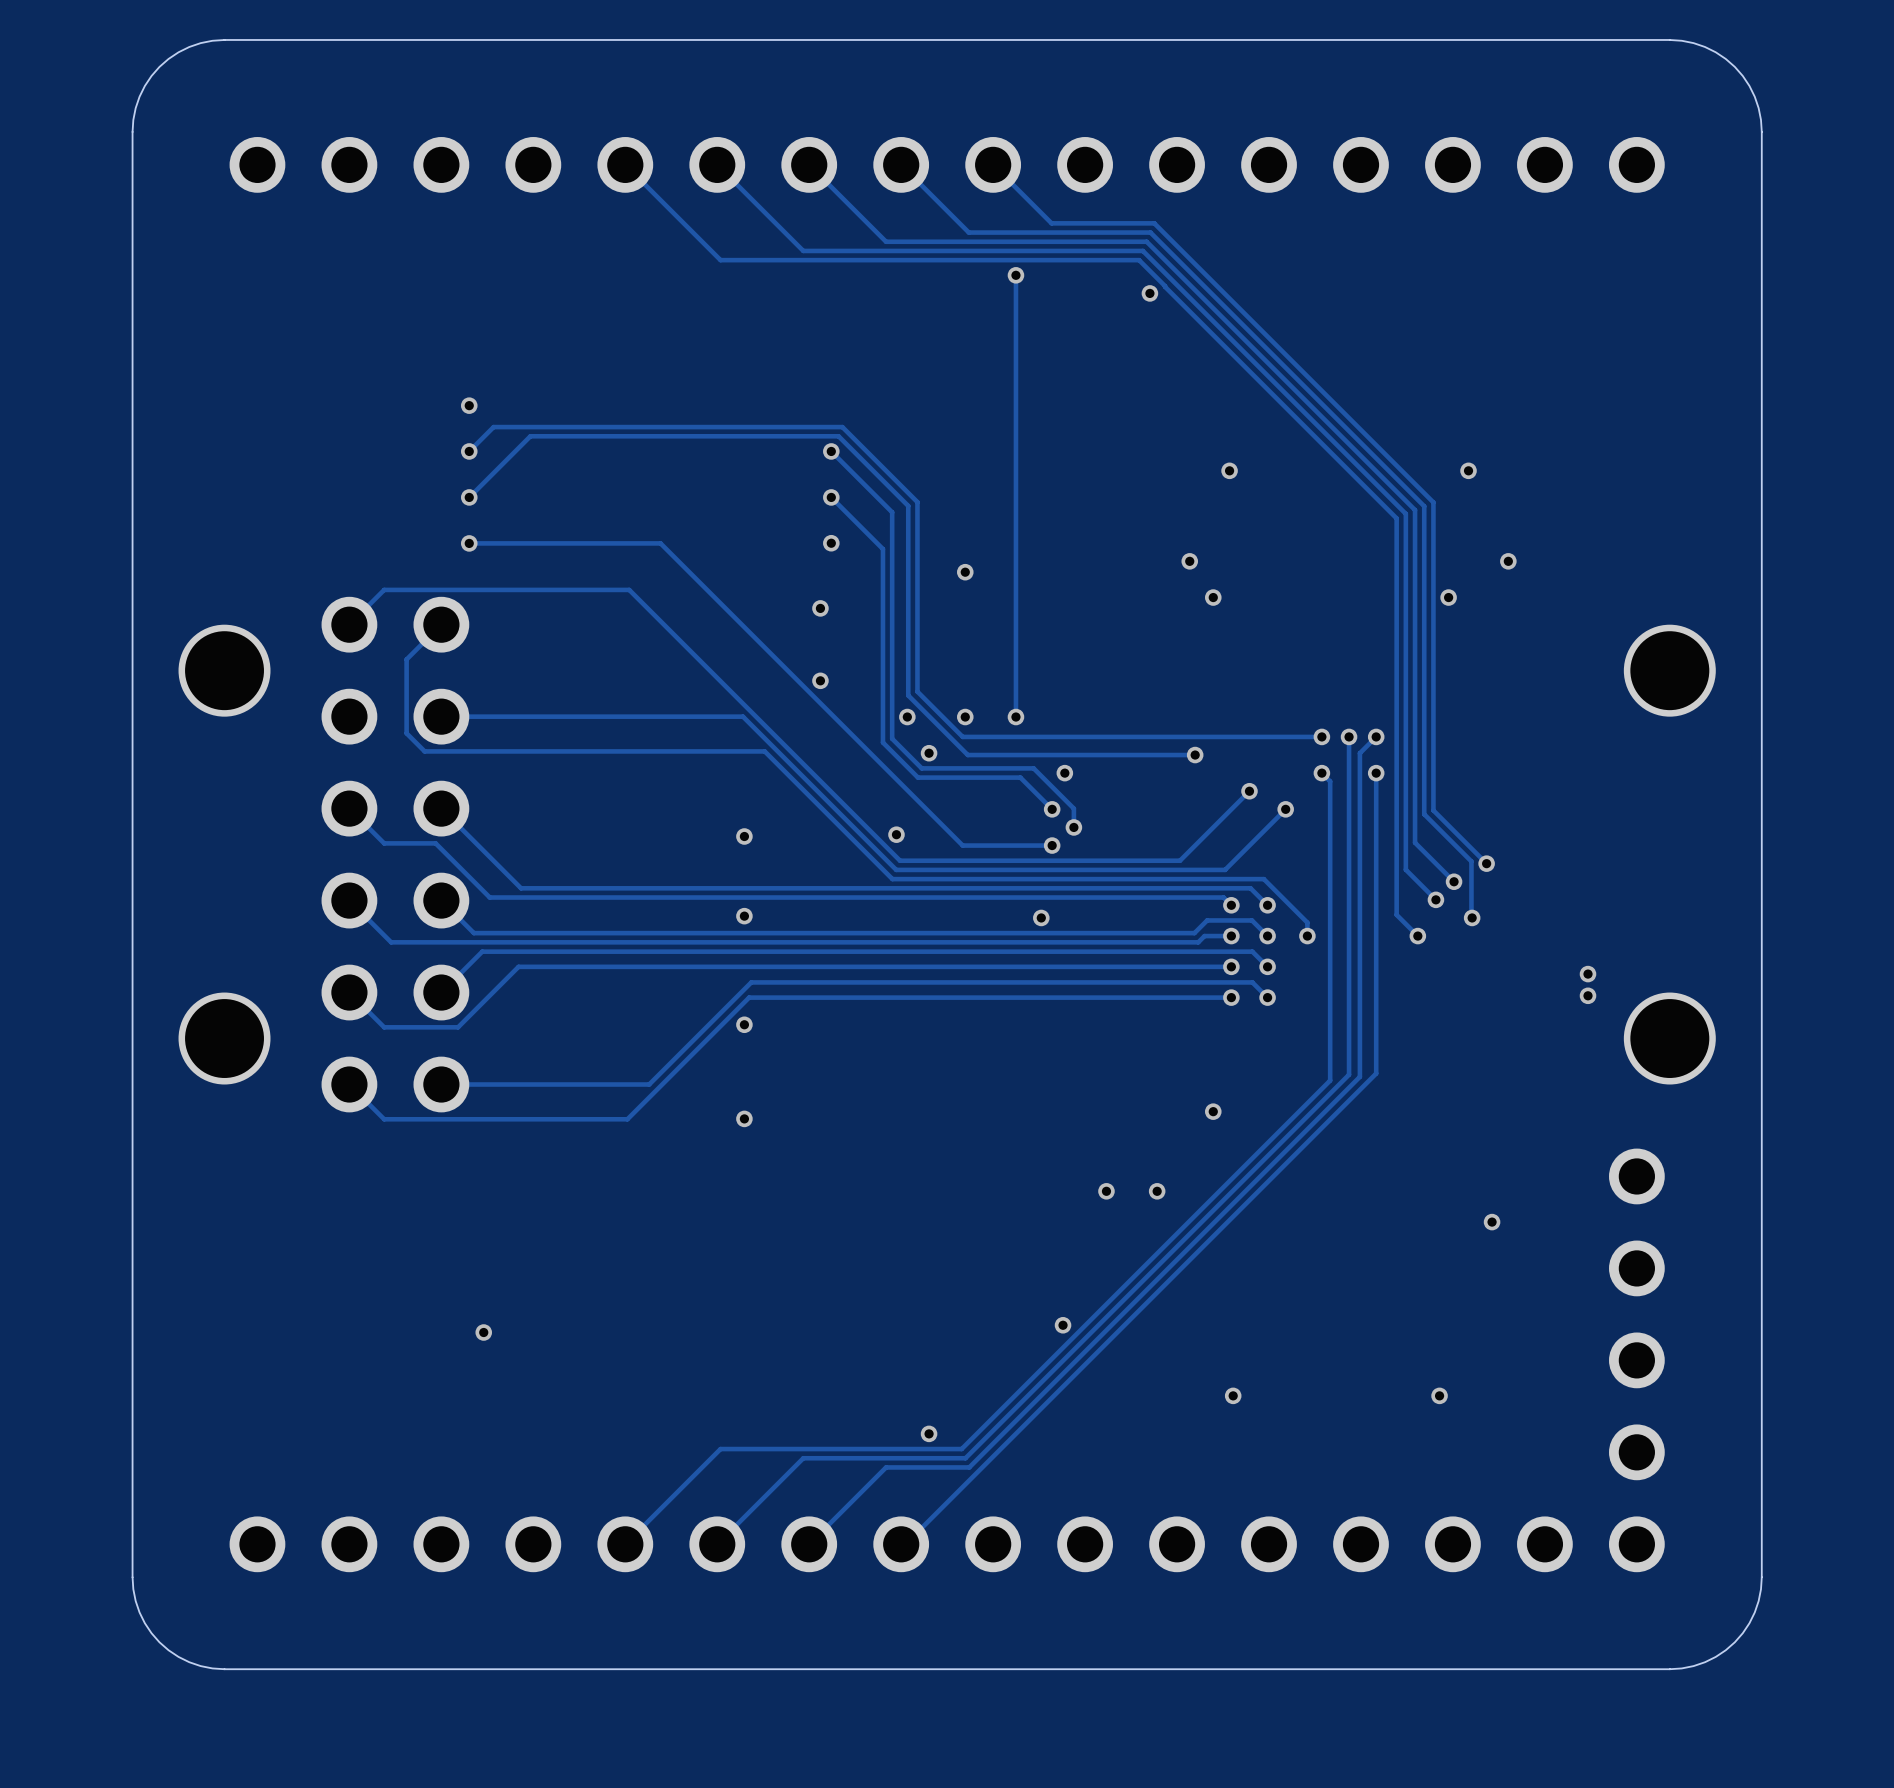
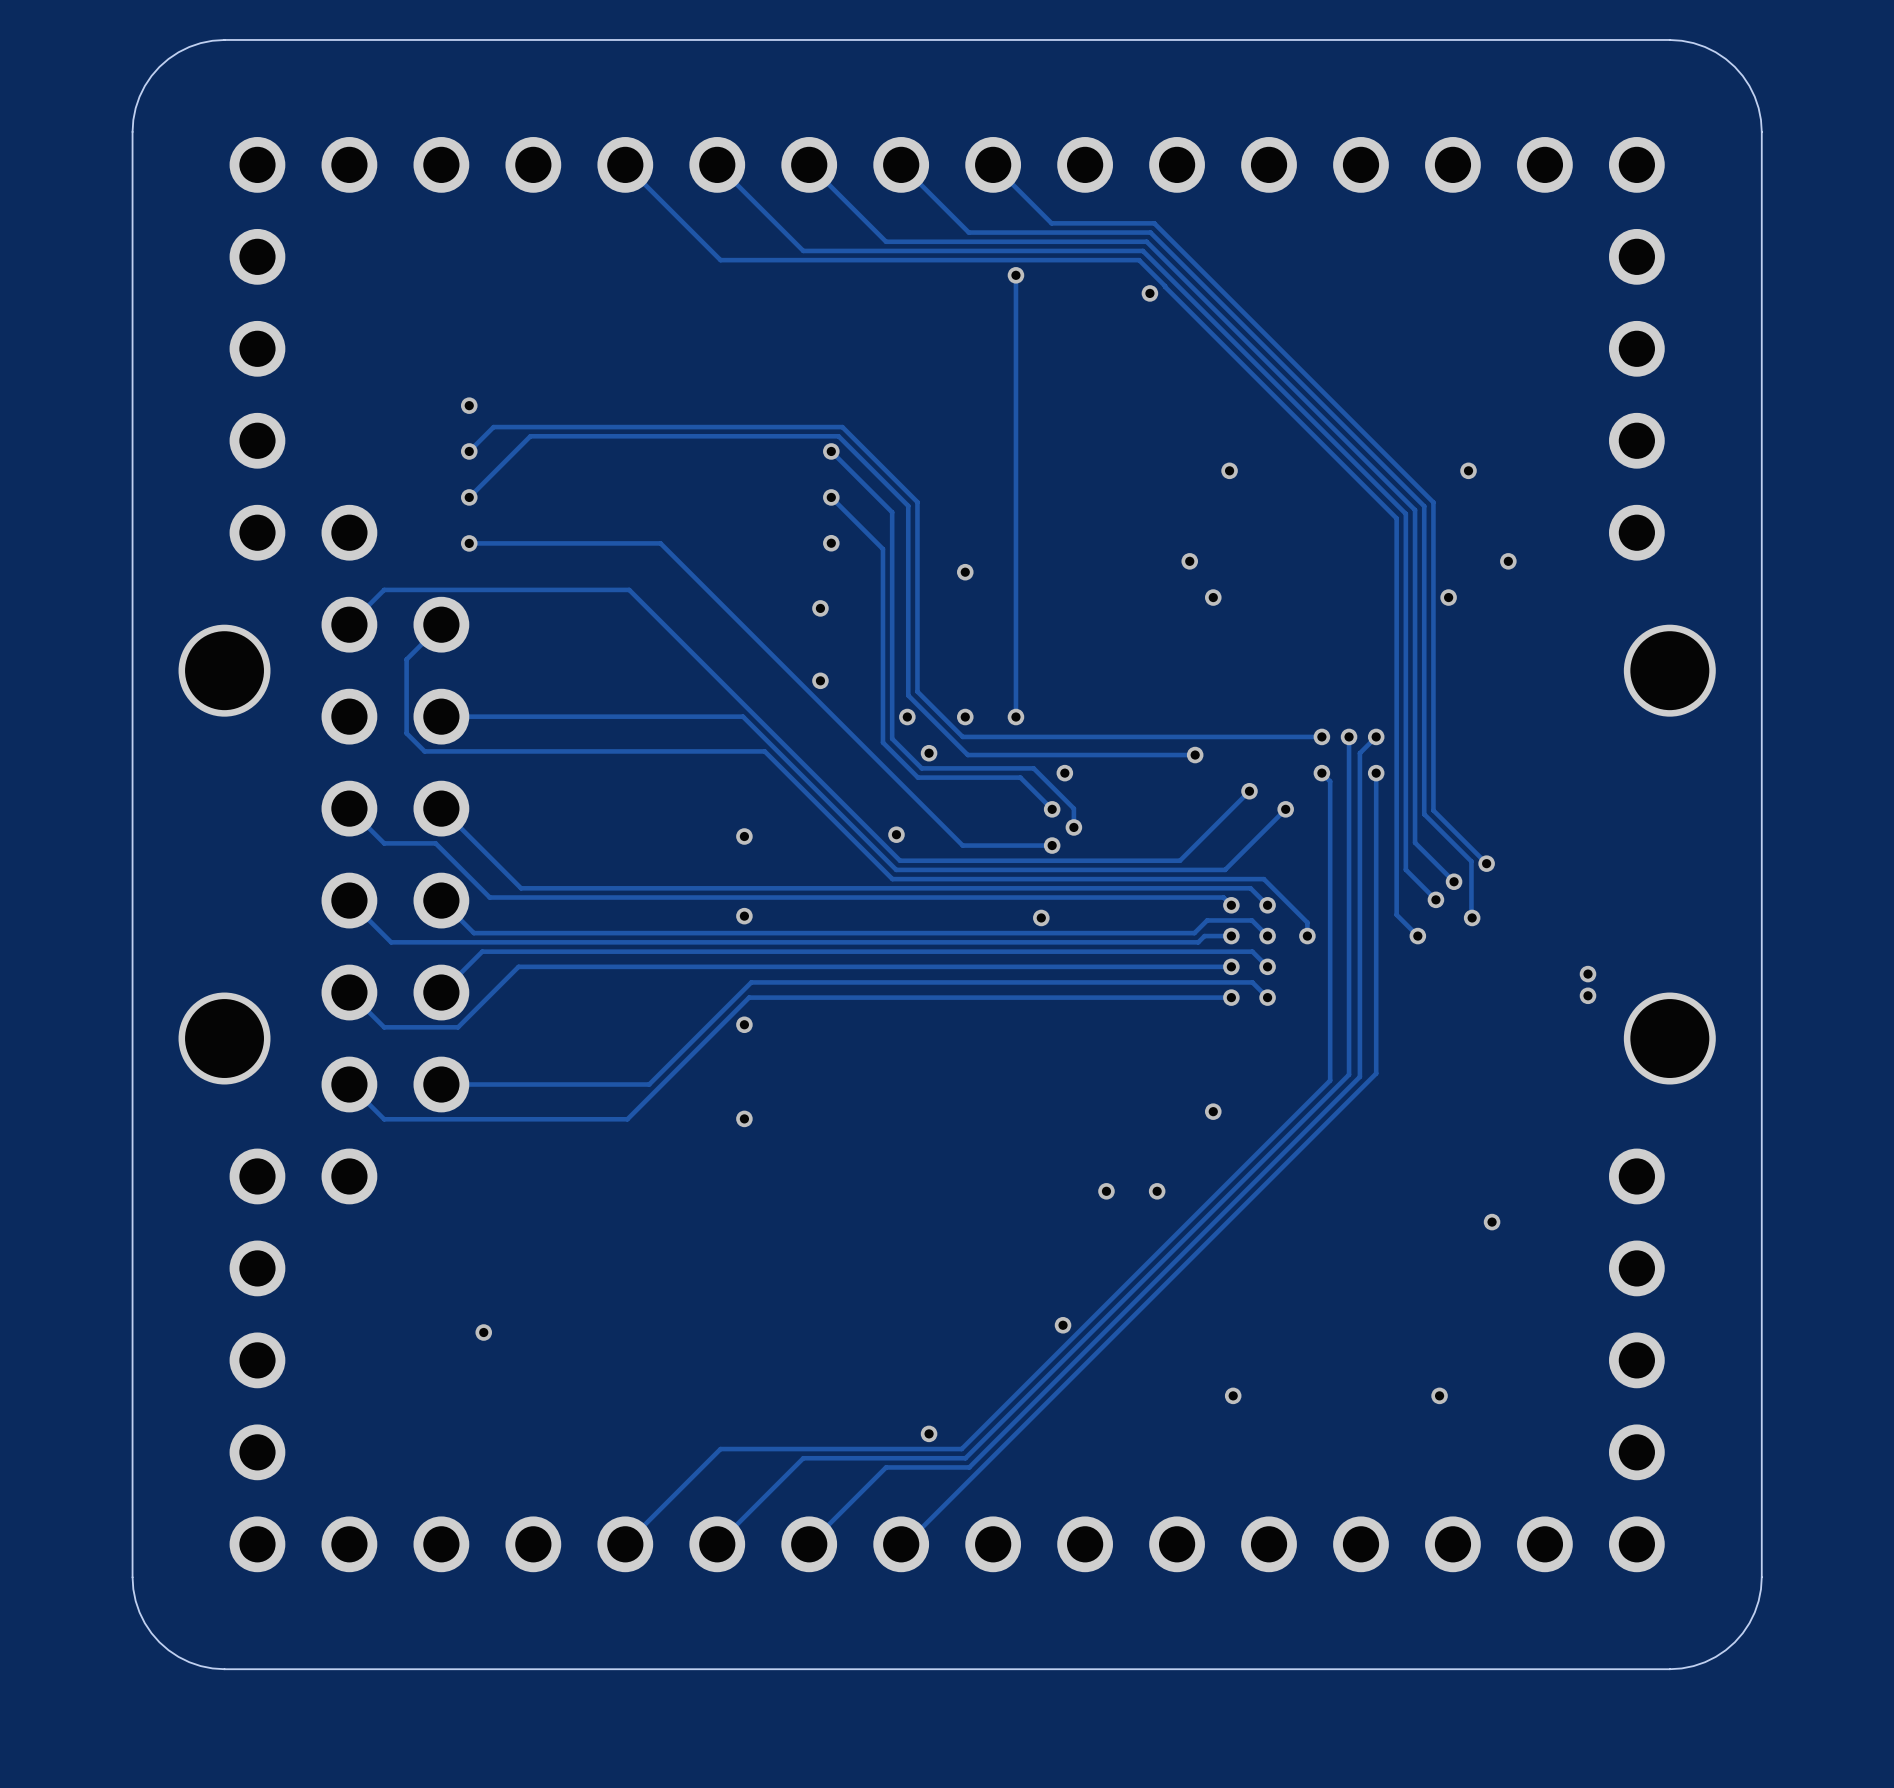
part: none -> (303, 394)
part: none -> (1636, 394)
part: none -> (303, 1314)

